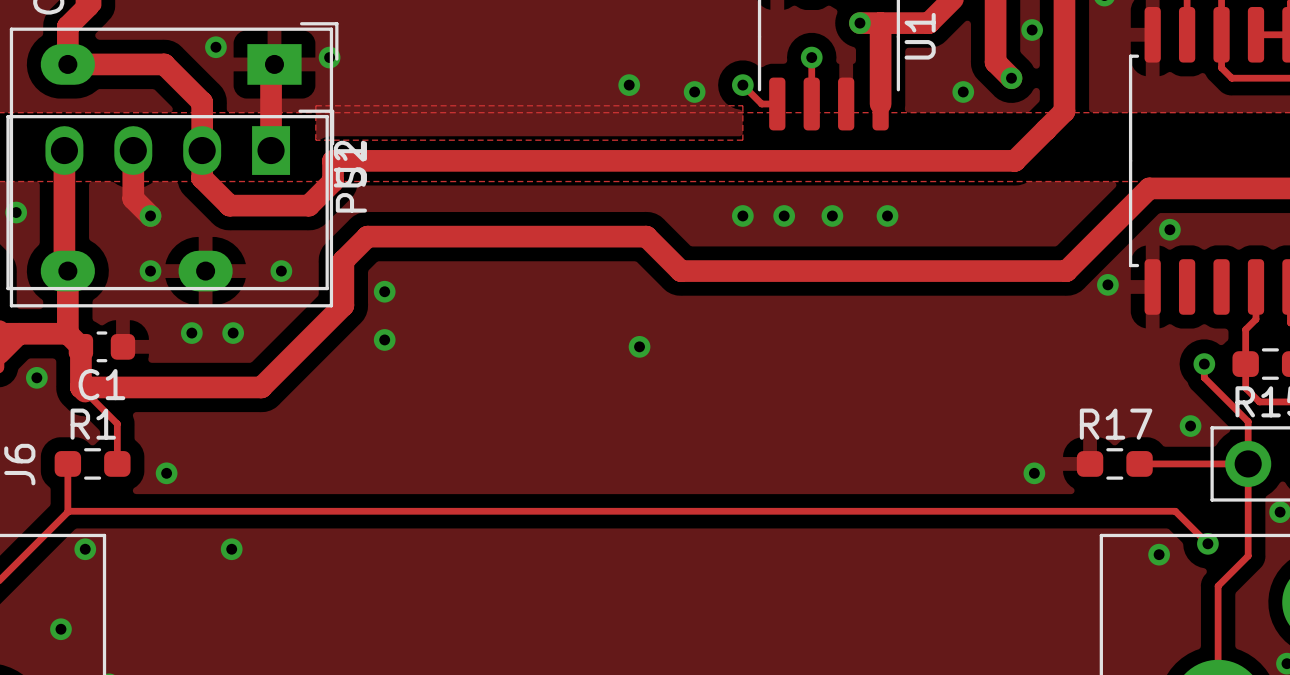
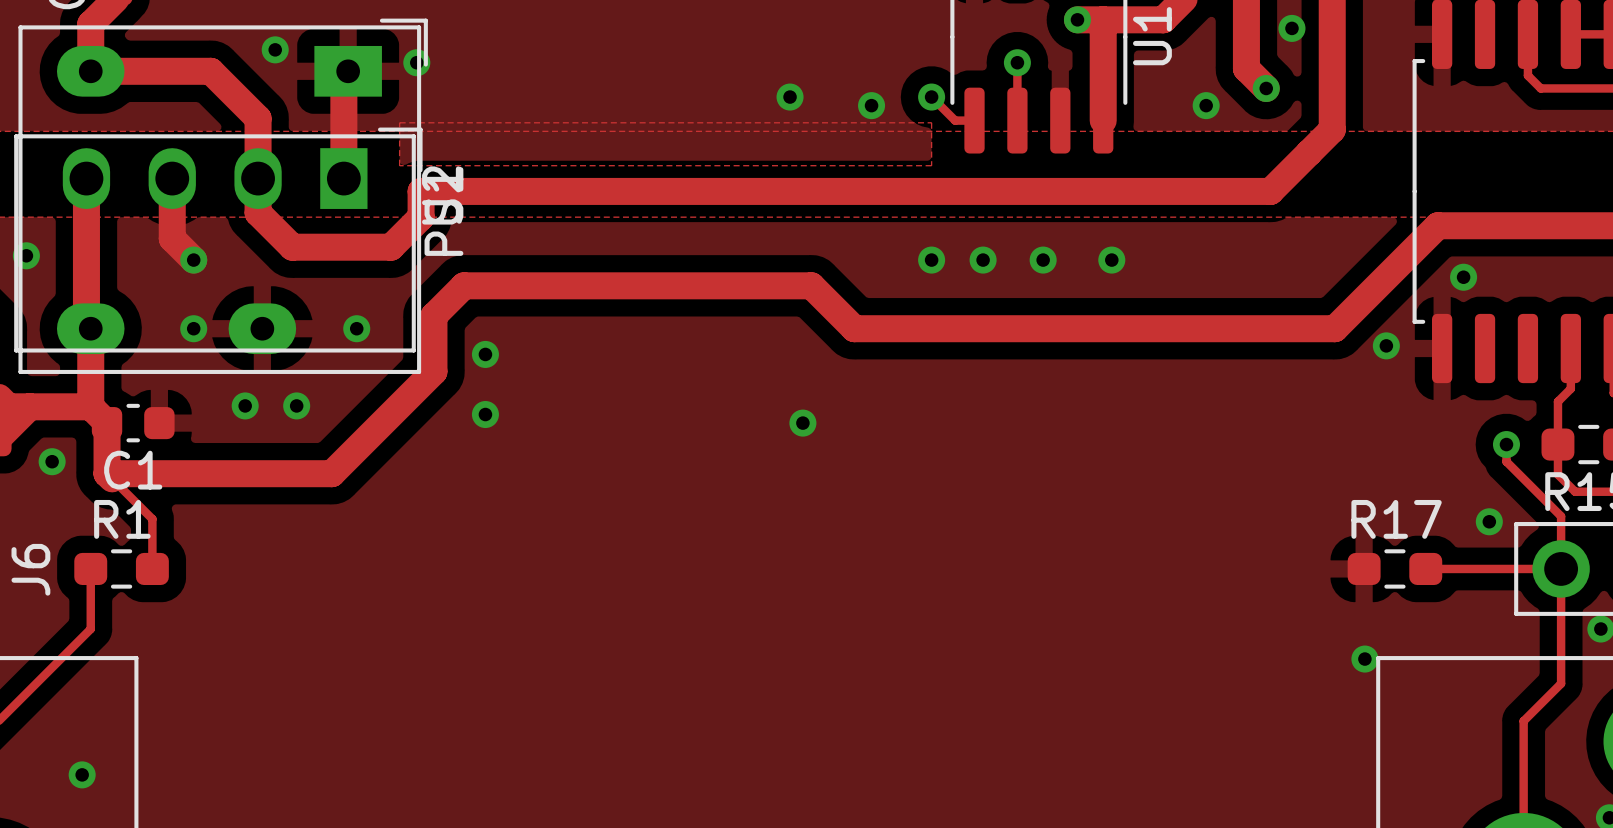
via: (166, 473) -> none
via: (1034, 473) -> none
track: (67, 512) (1175, 511) (1207, 543) -> none
via: none -> (1364, 659)
via: (1207, 543) -> none
via: (85, 549) -> none
via: (231, 549) -> none
via: (1159, 554) -> none

